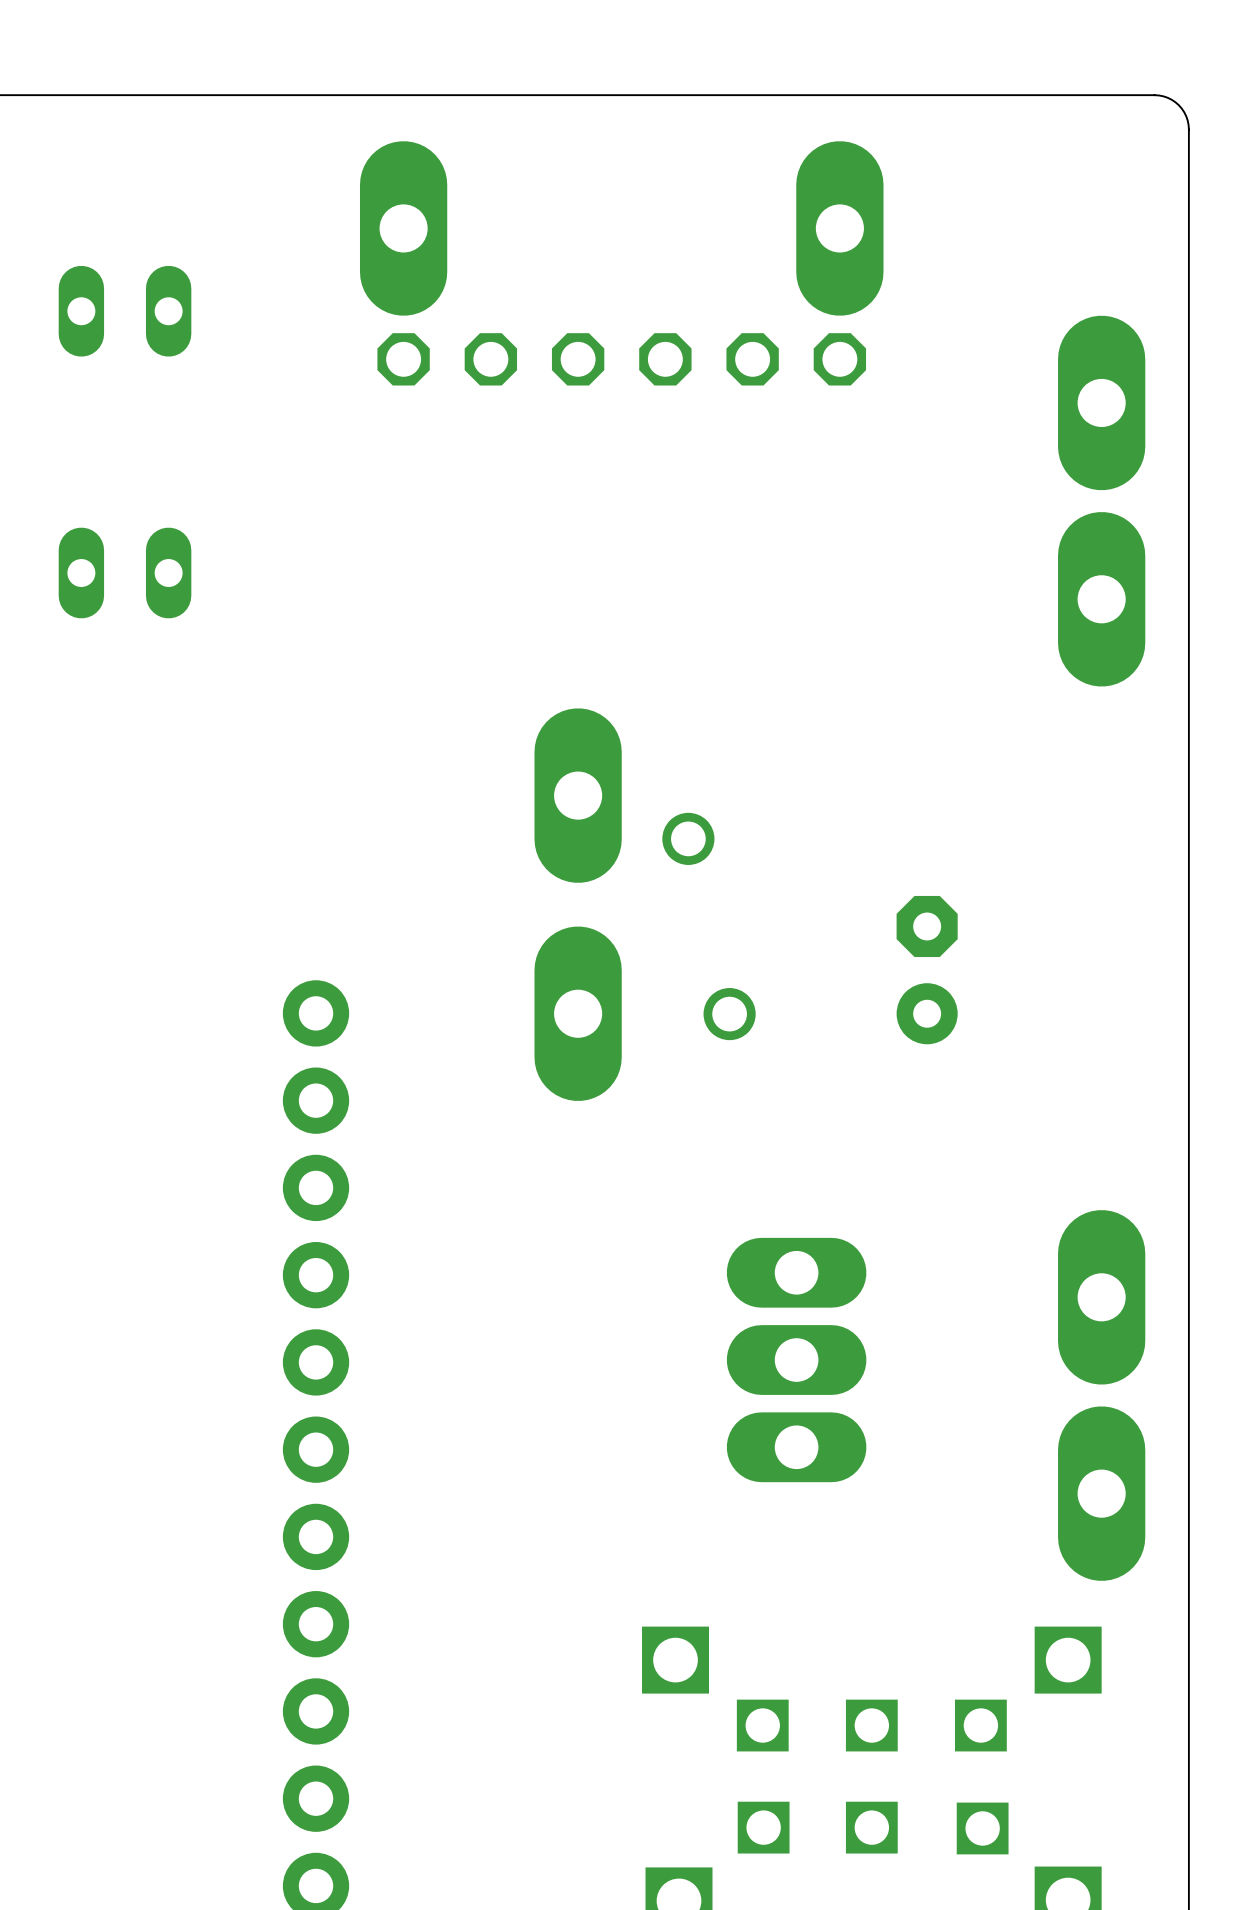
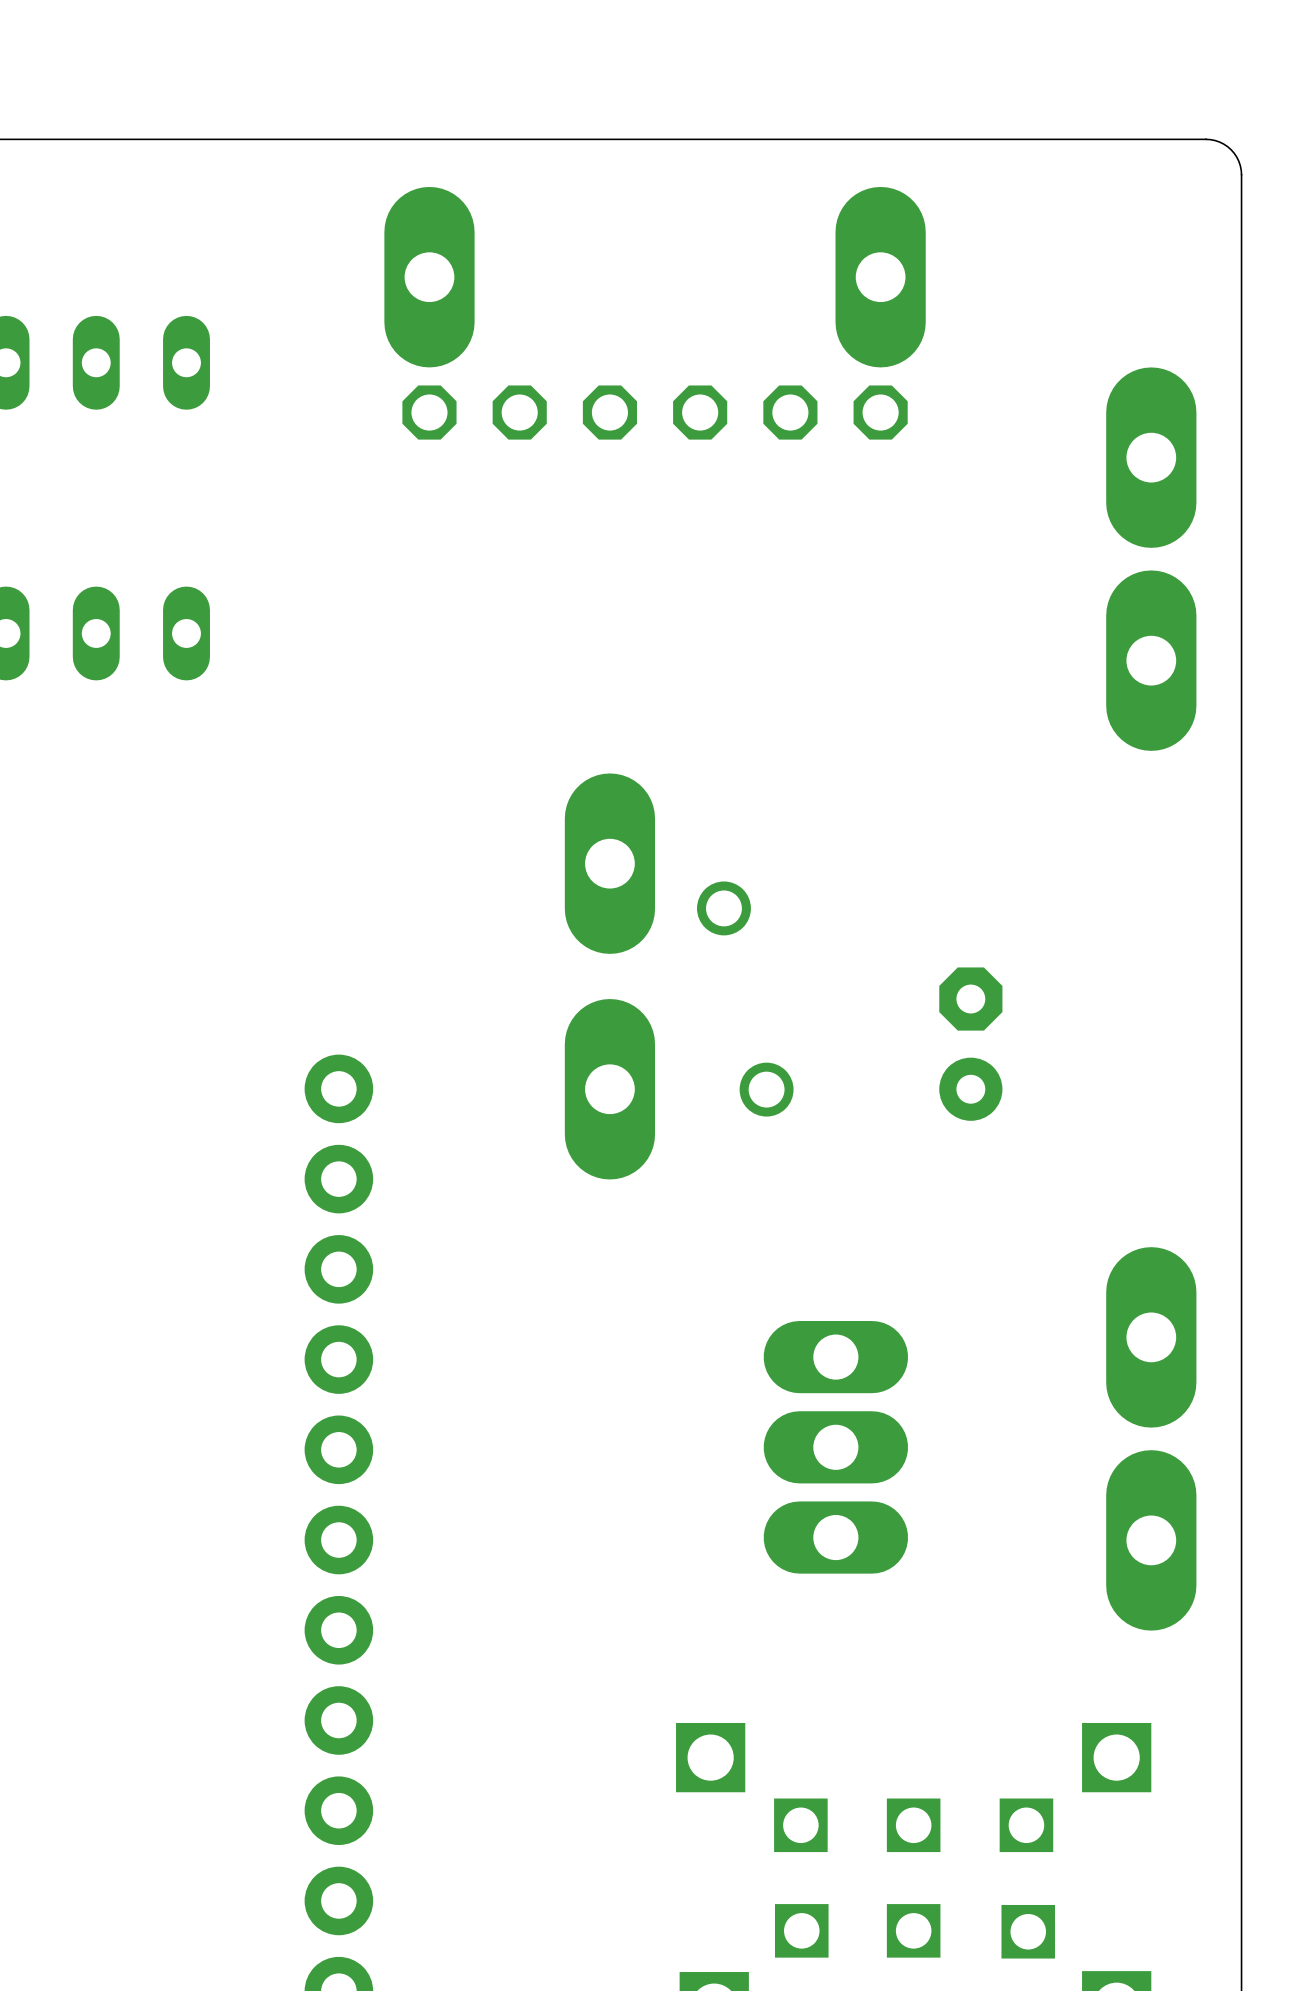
part position: (1101, 1297) -> (1151, 1337)
part position: (1101, 1493) -> (1151, 1540)

